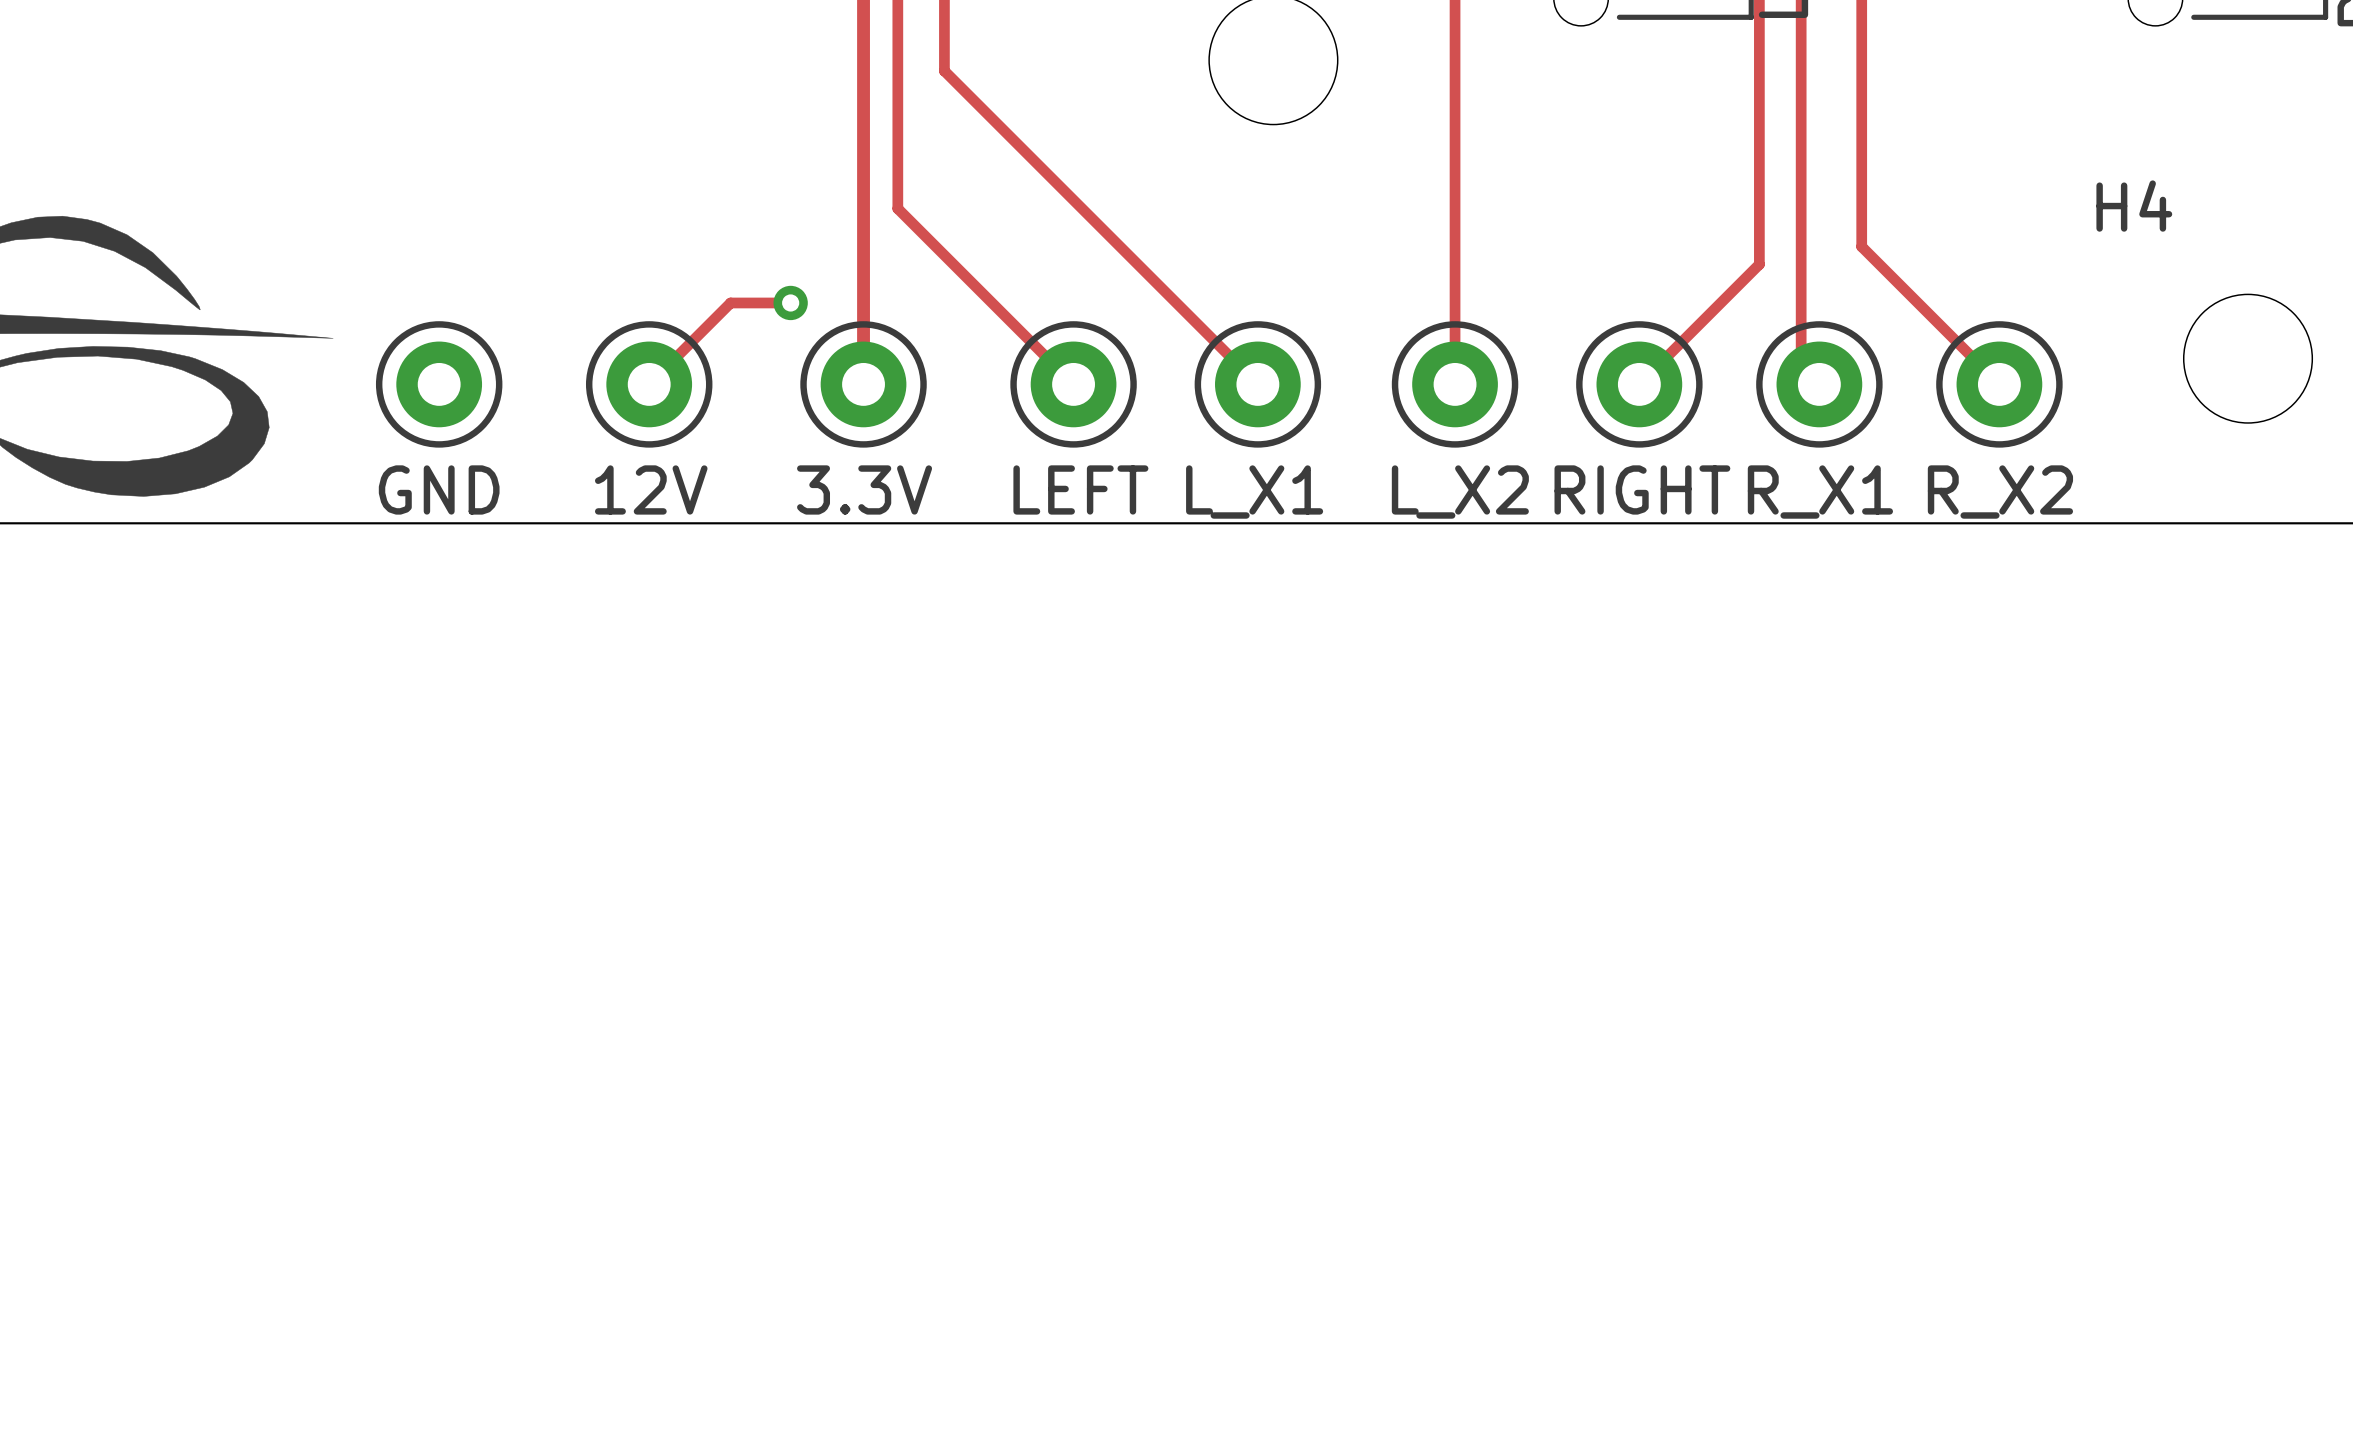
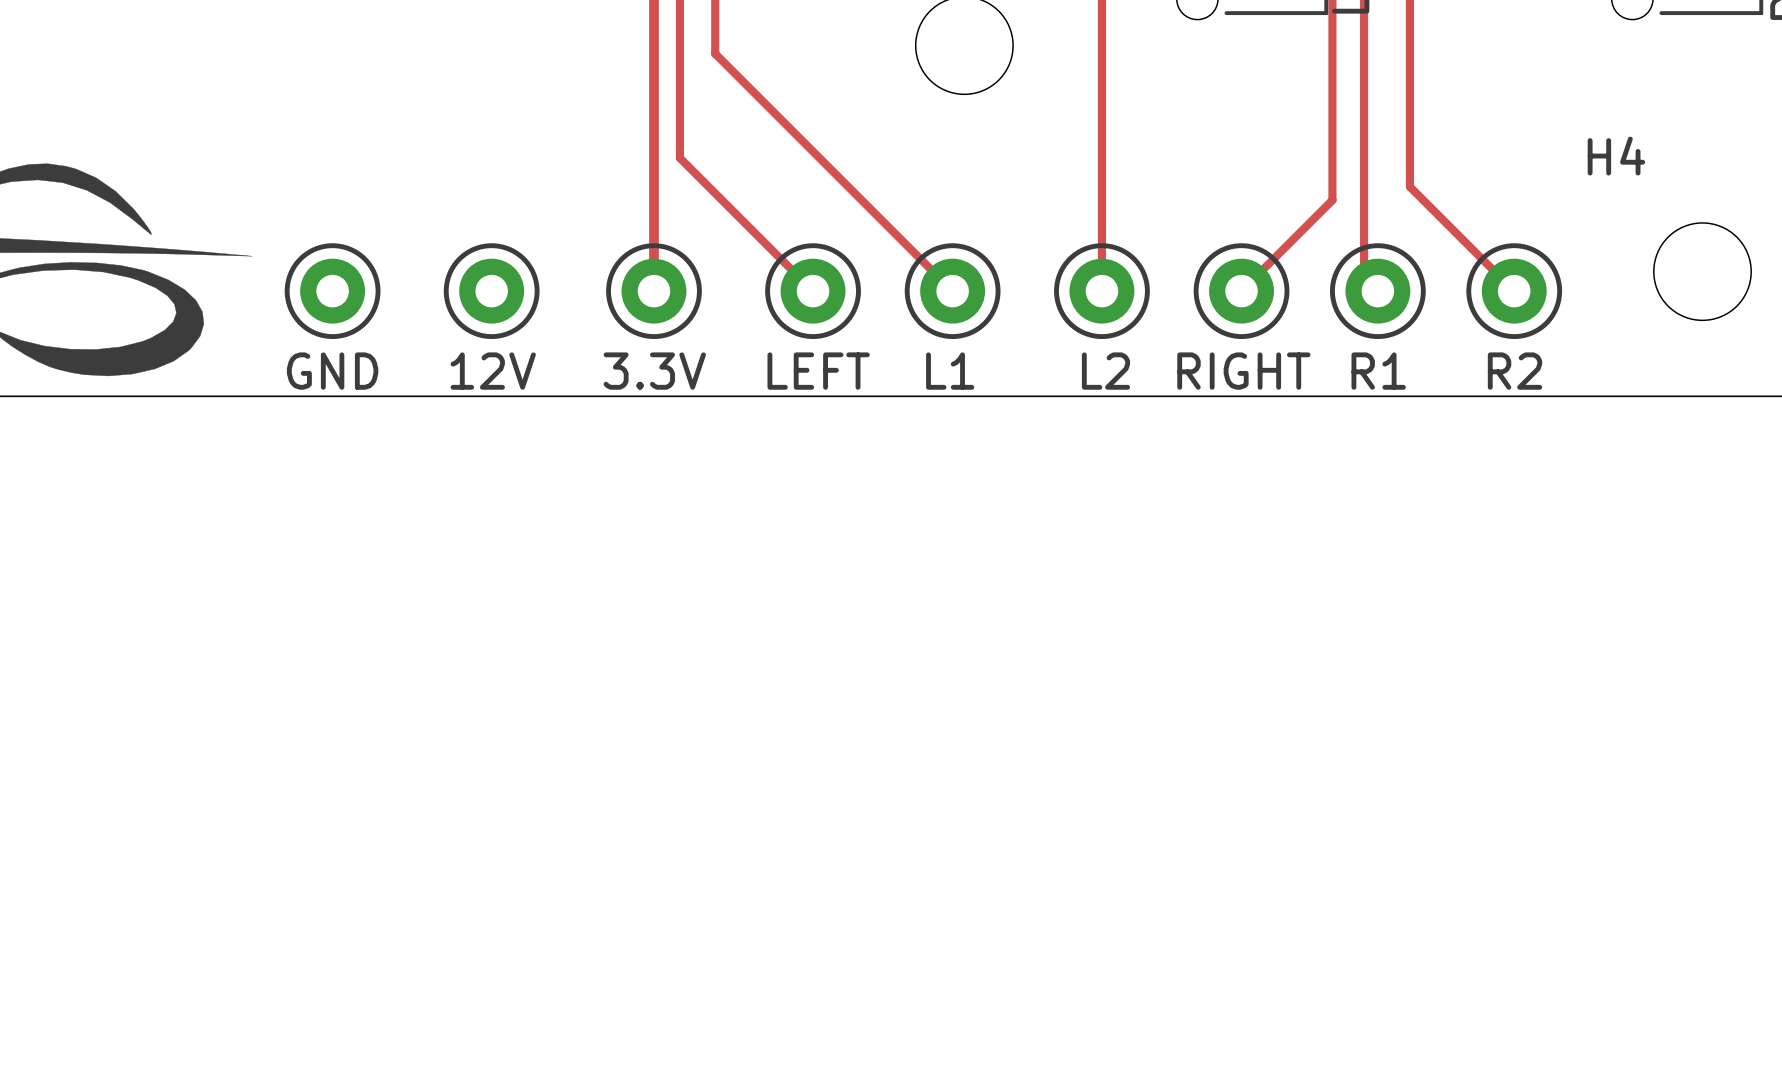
track: (790, 302) (730, 302) (649, 384) -> none
via: (790, 302) -> none
L_X1 name: L_X1 (1254, 492) -> L1 (950, 371)
L_X2 name: L_X2 (1460, 492) -> L2 (1105, 371)
R_X1 name: R_X1 (1820, 492) -> R1 (1378, 371)
R_X2 name: R_X2 (2000, 492) -> R2 (1514, 371)

